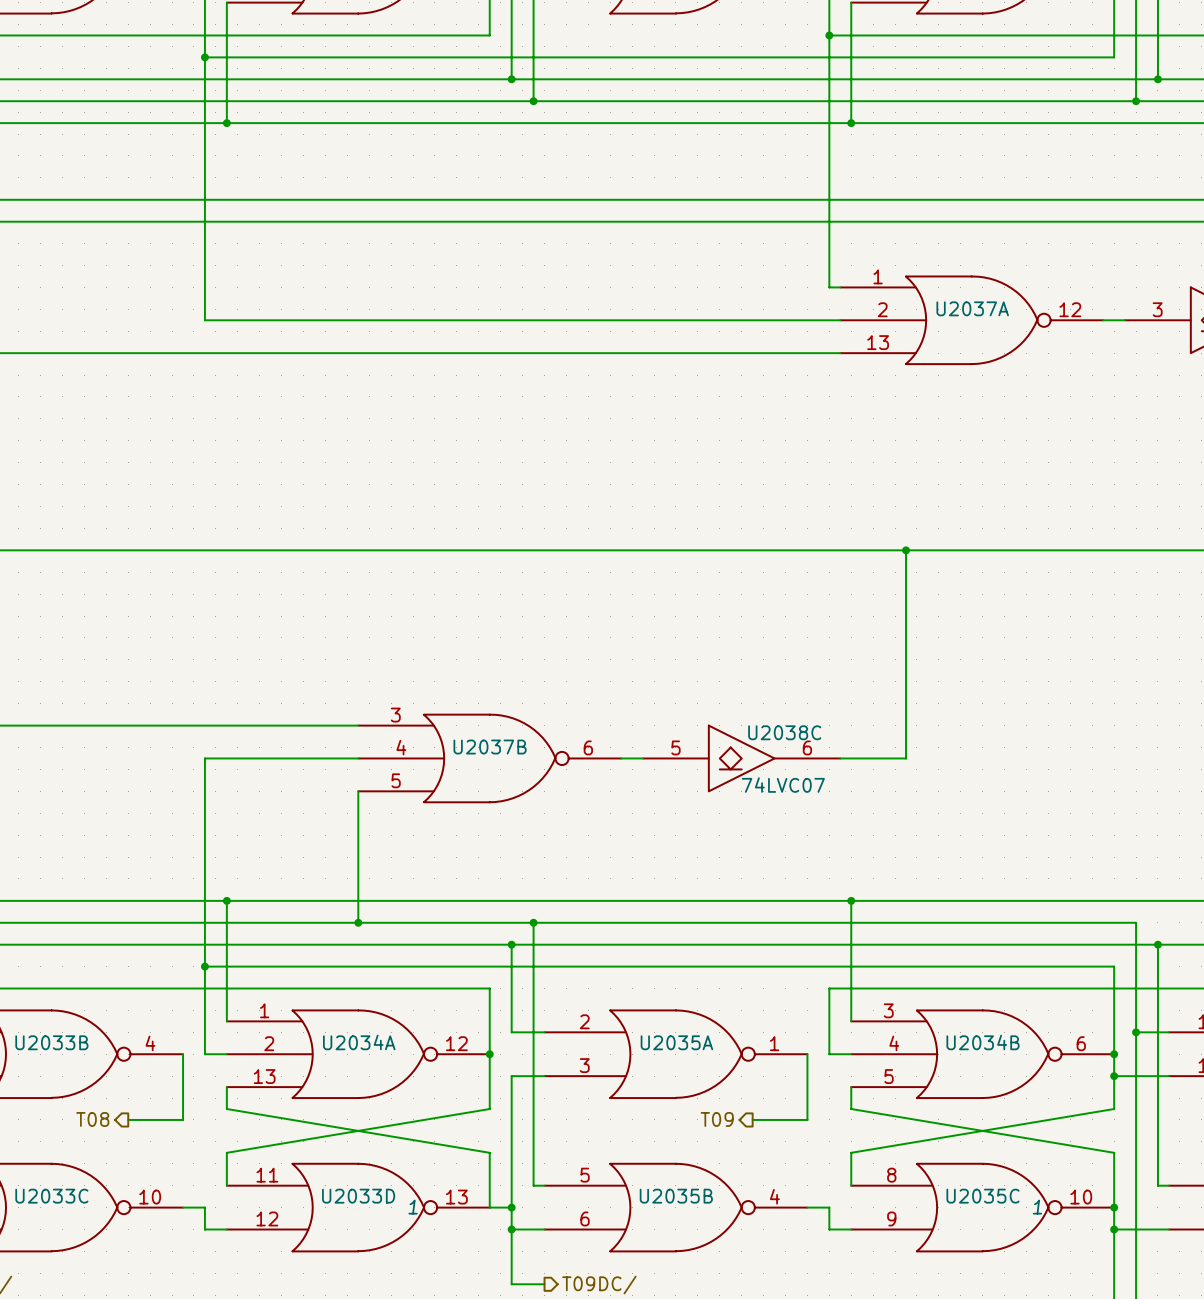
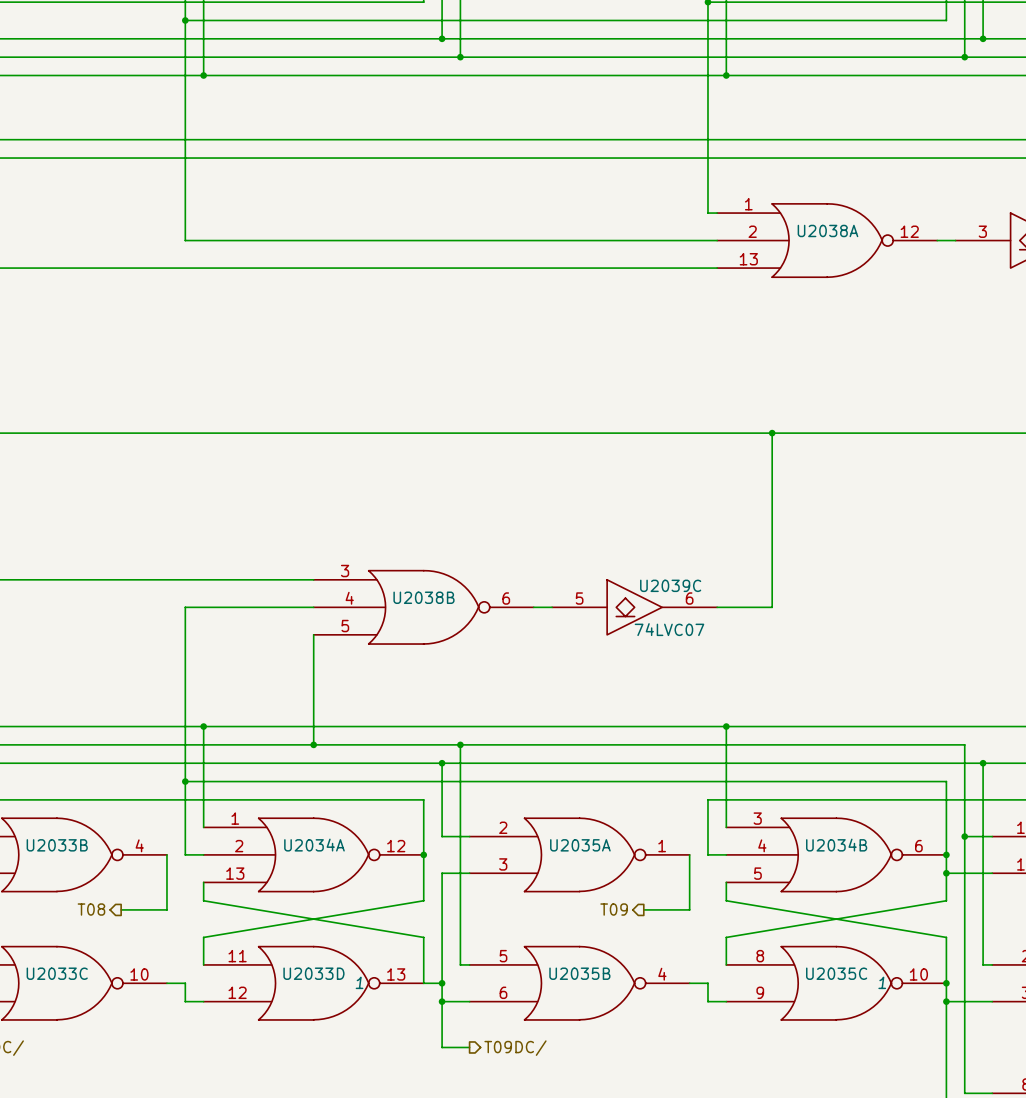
U2037A name: U2037A (972, 308) -> U2038A (827, 230)
U2038C name: U2038C (784, 732) -> U2039C (670, 585)
U2037B name: U2037B (490, 747) -> U2038B (423, 597)

